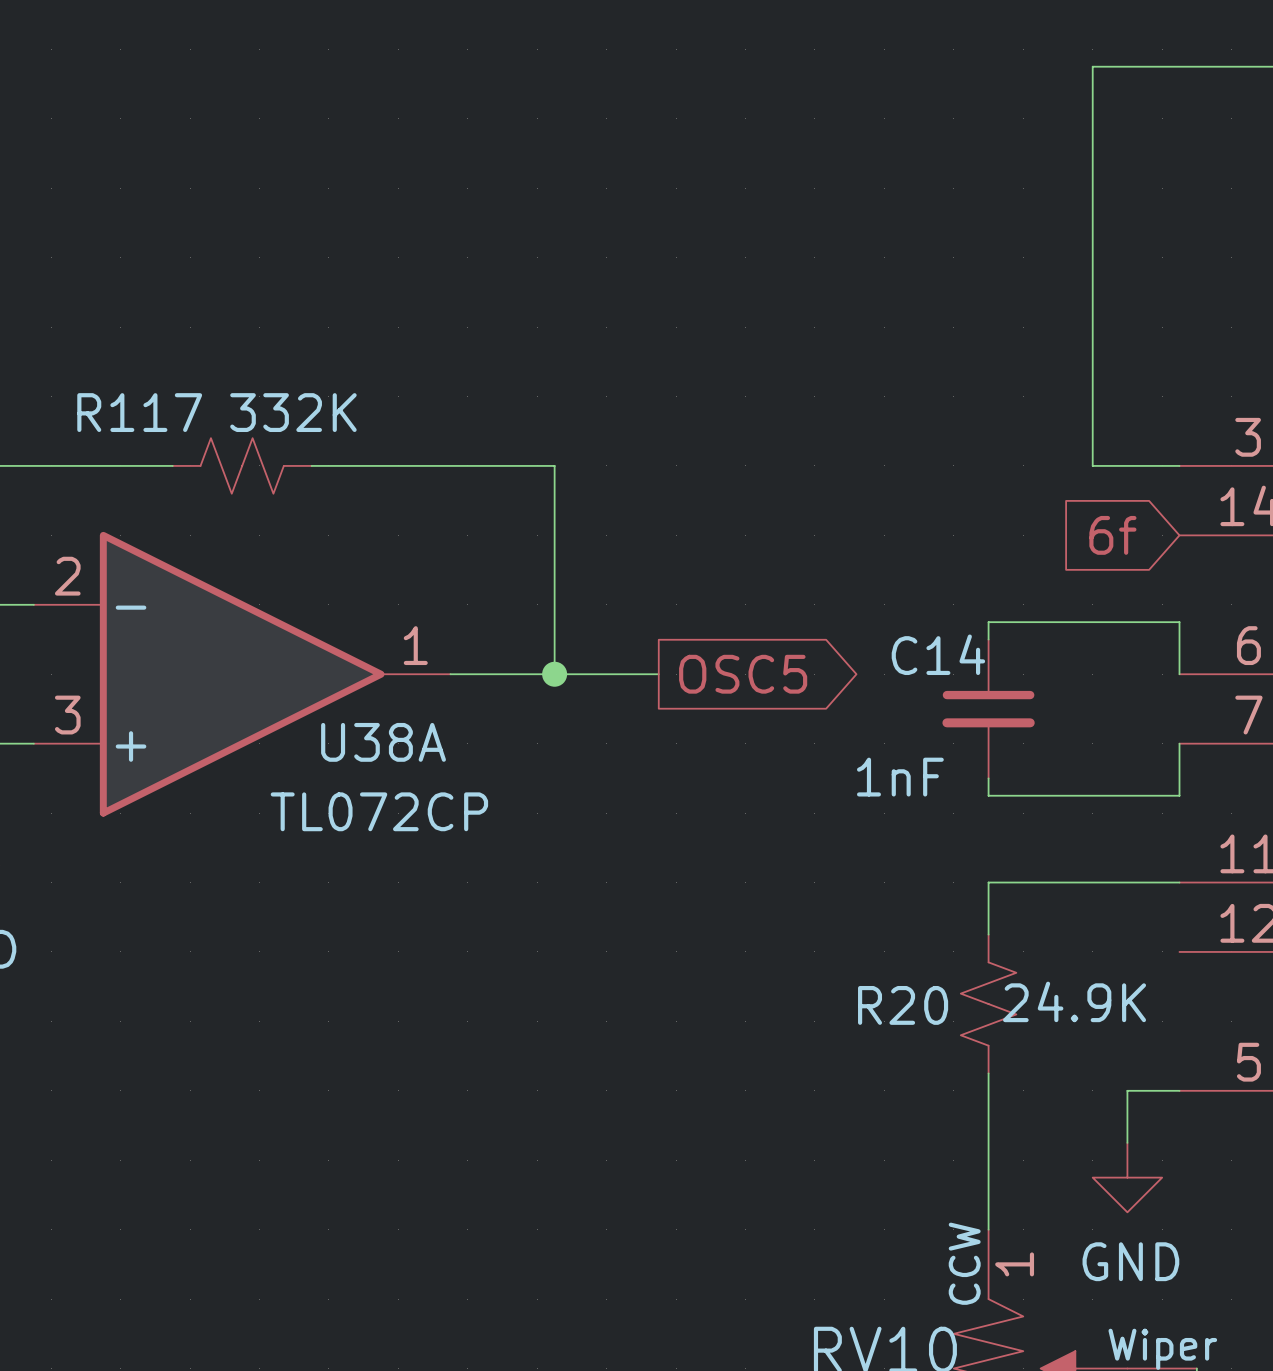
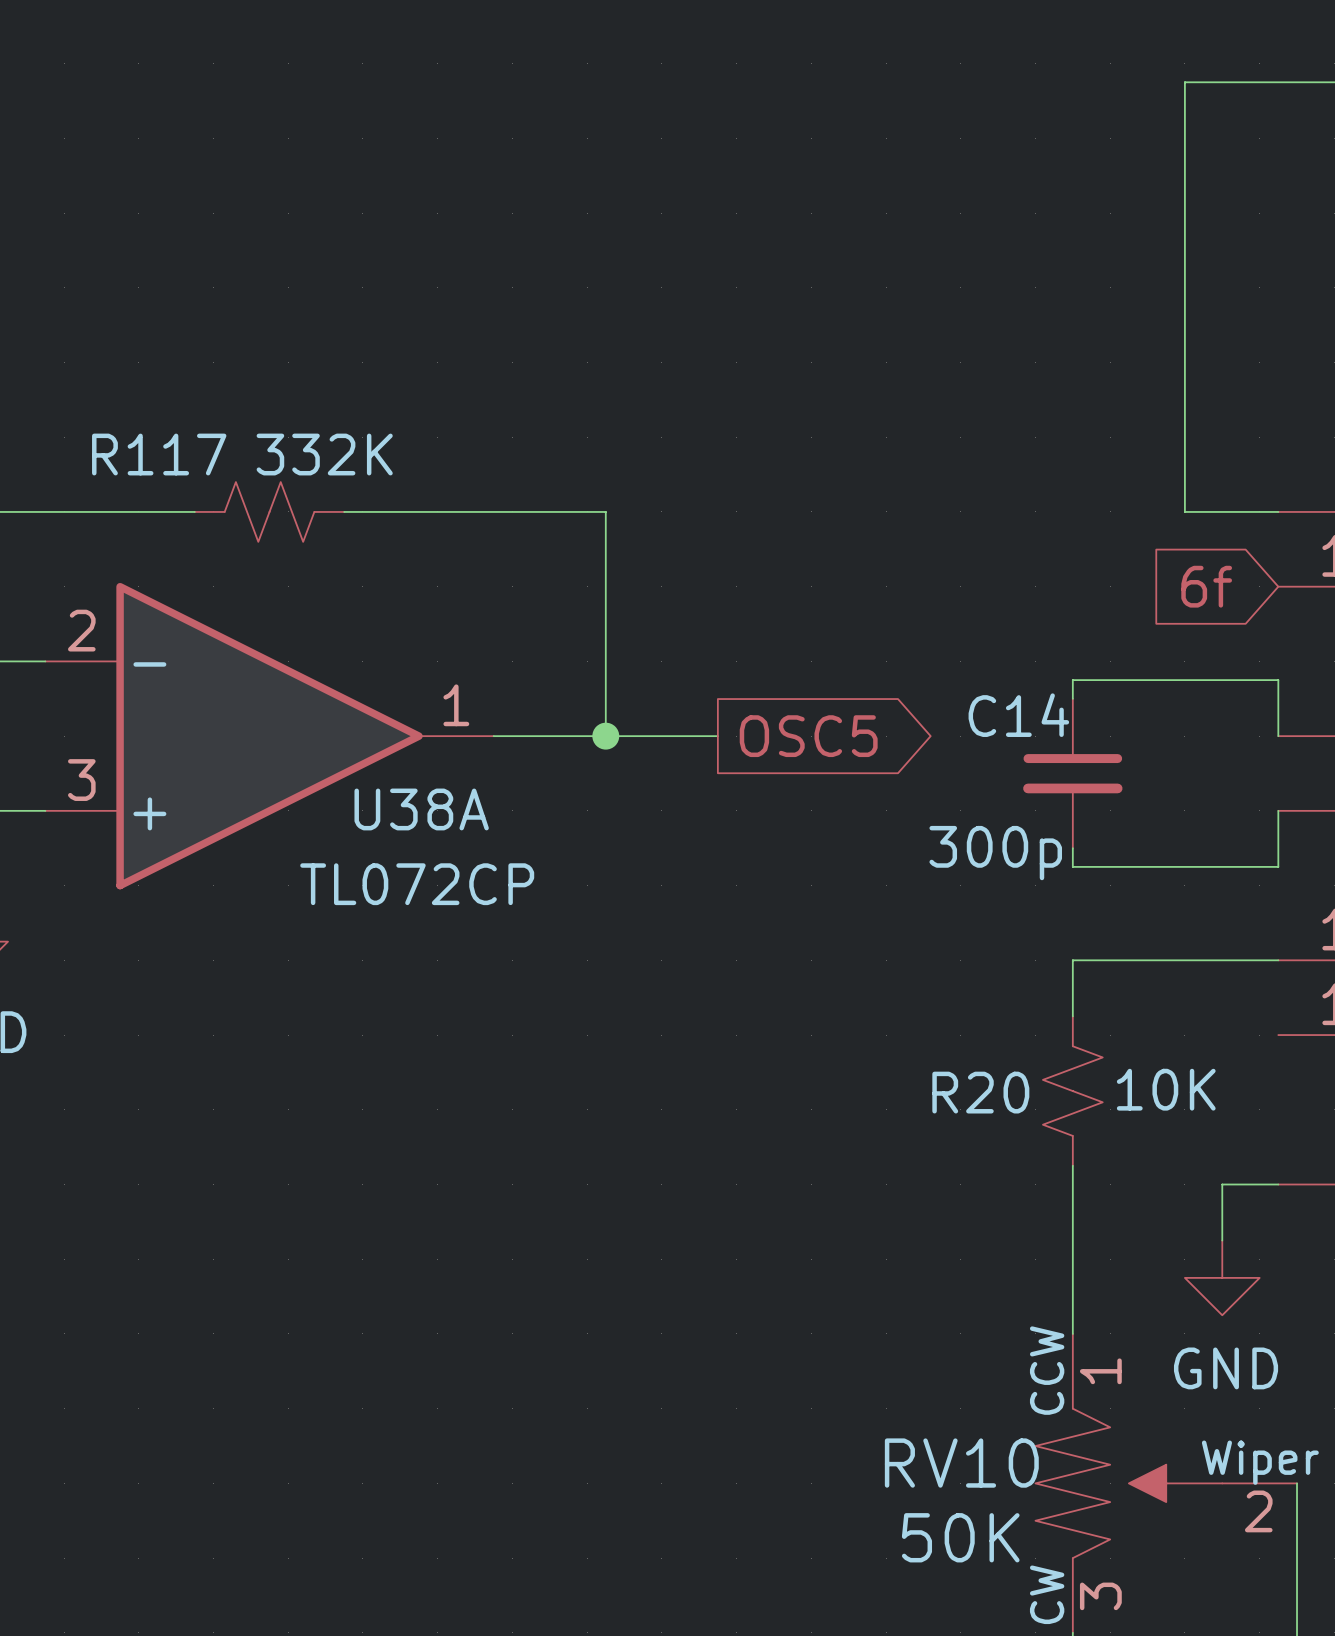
C14 value: 1nF (900, 777) -> 300p (995, 853)
R20 value: 24.9K (1074, 1001) -> 10K (1166, 1089)

